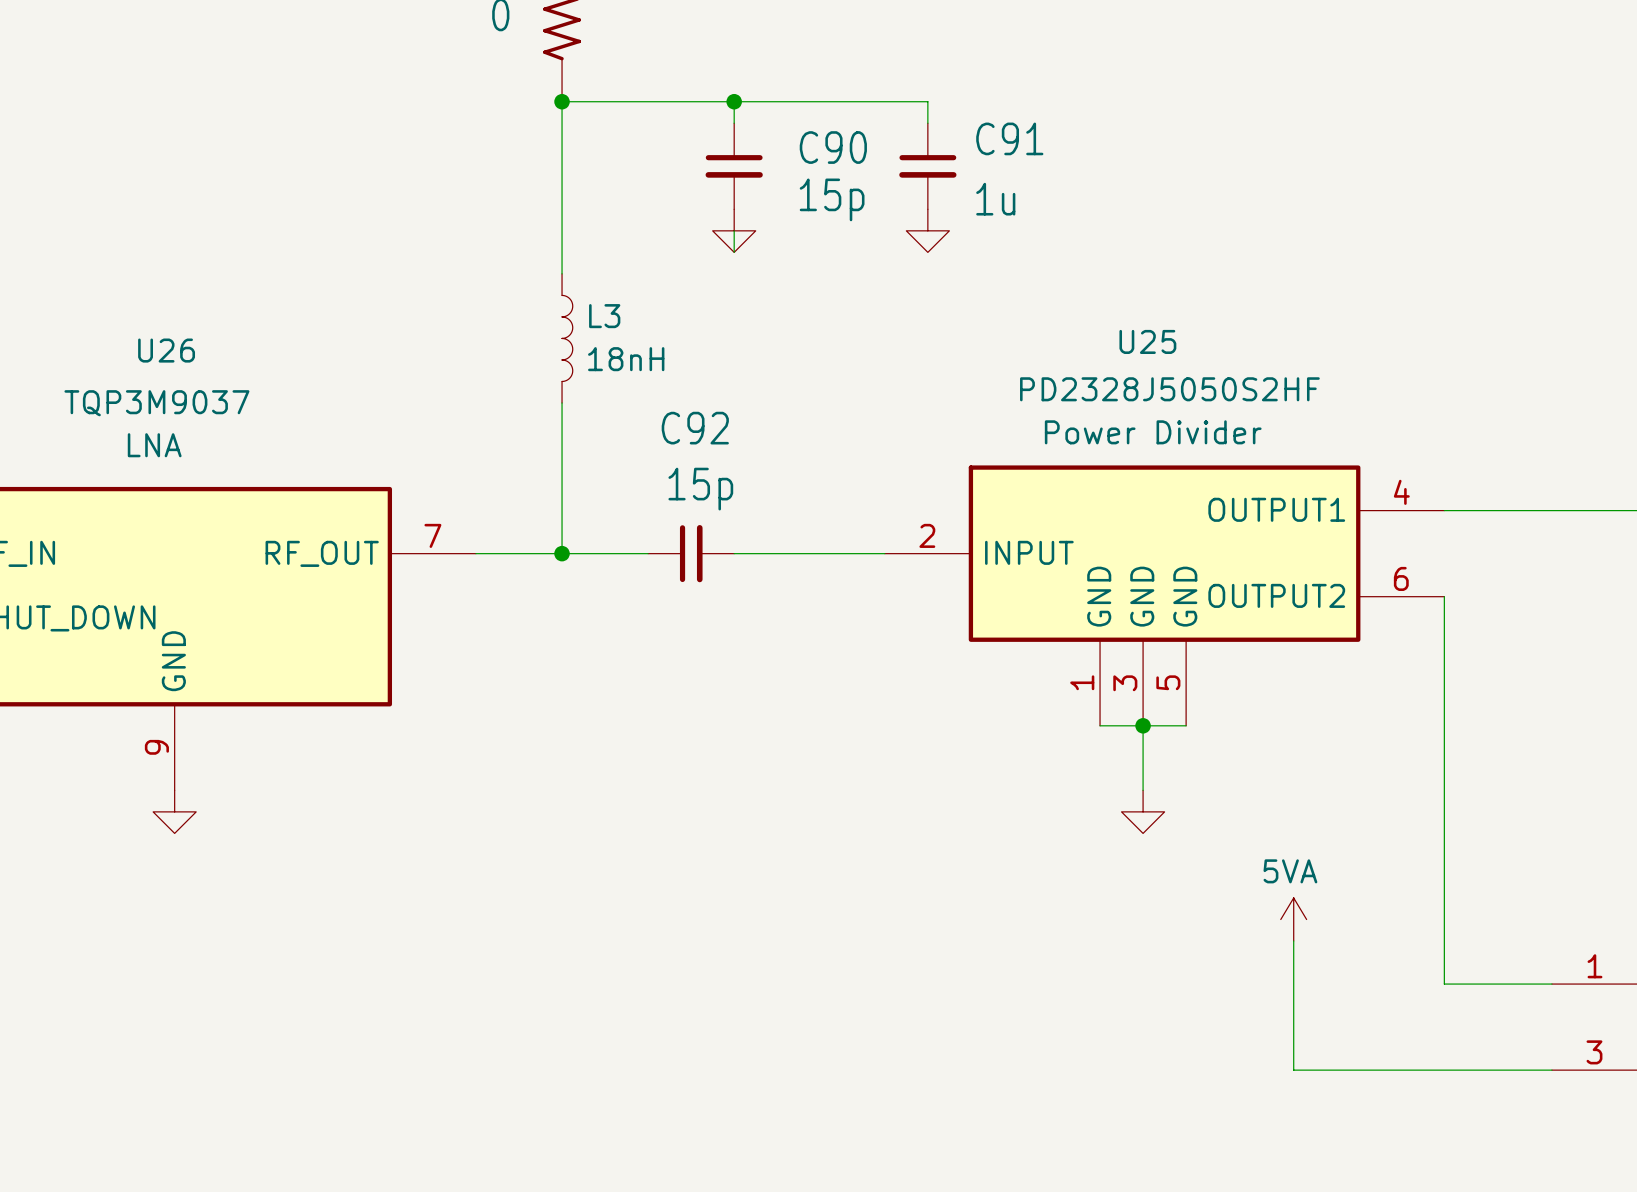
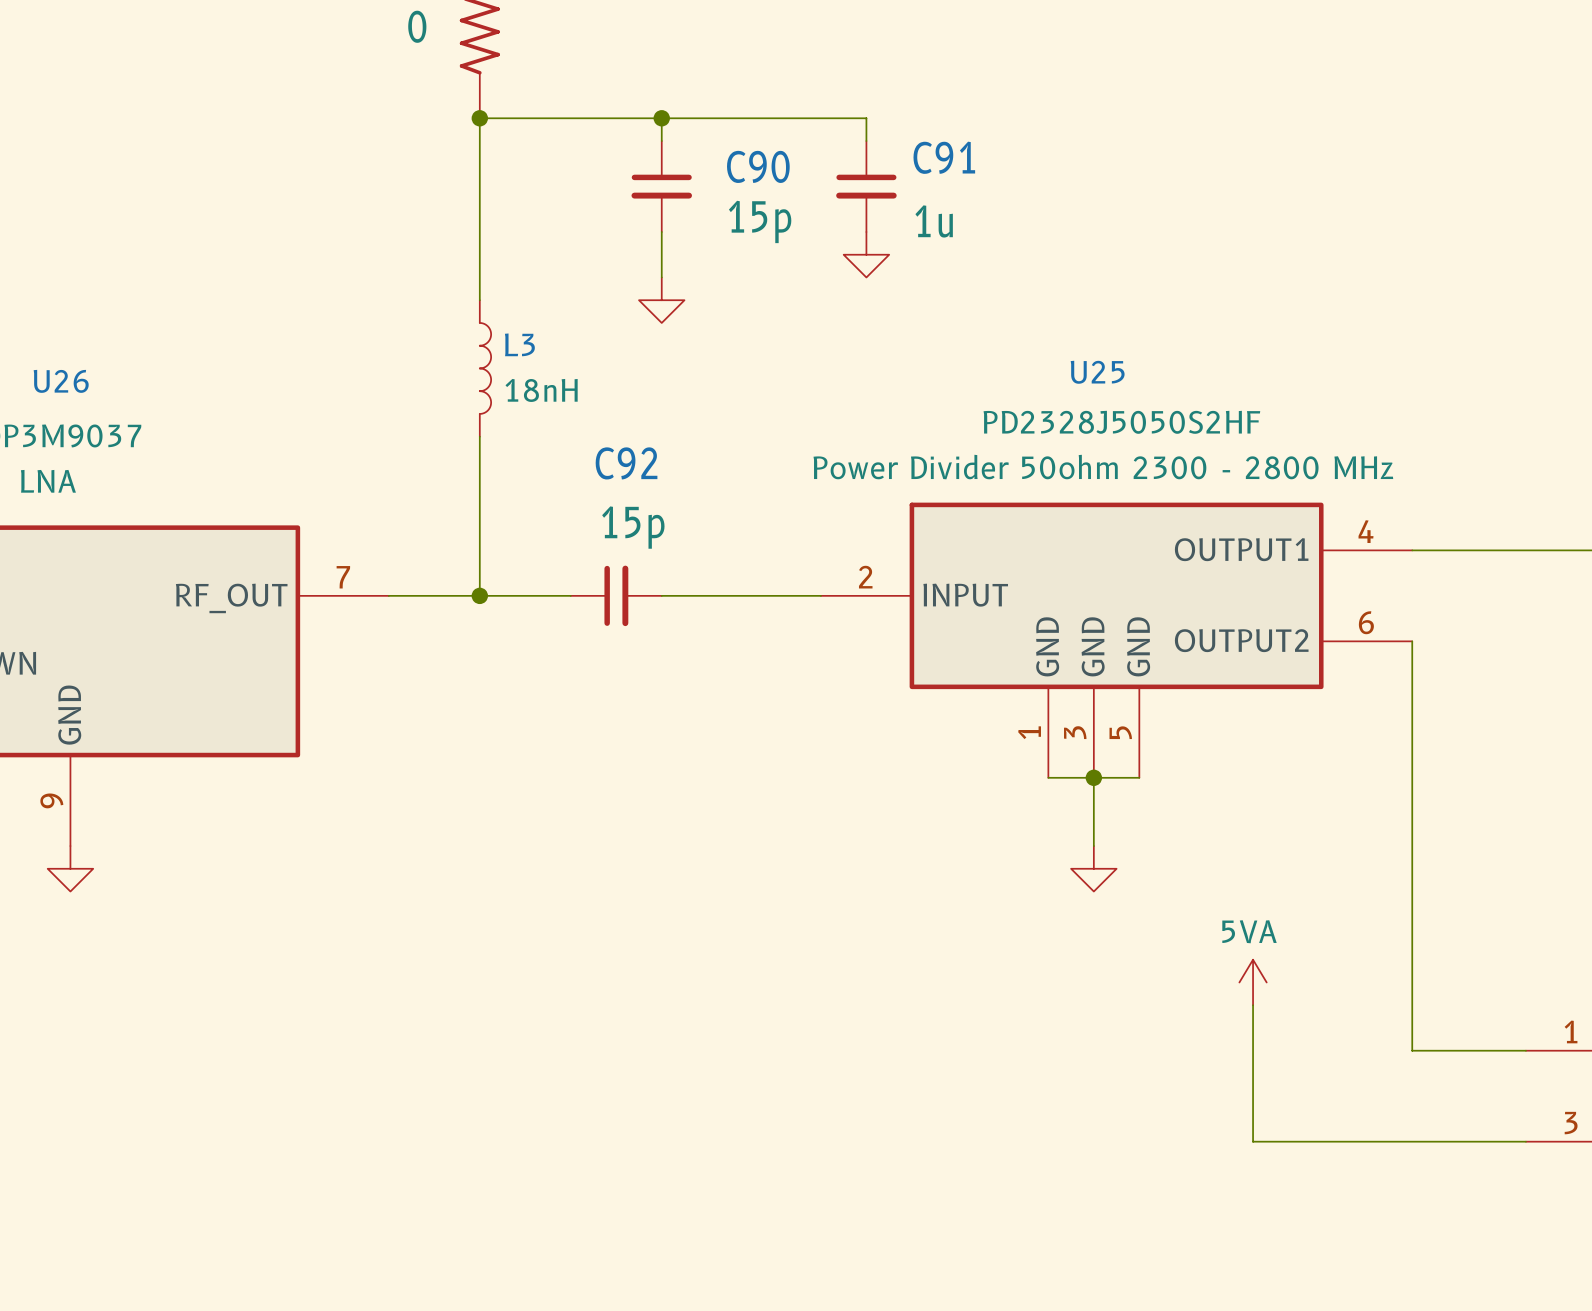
power symbol position: (734, 230) -> (661, 300)
U25 text: Power Divider (1153, 432) -> Power Divider 50ohm 2300 - 2800 MHz (1103, 467)

